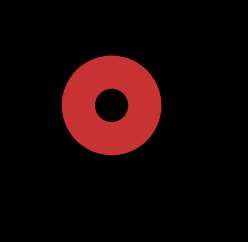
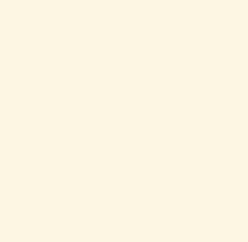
part: (111, 105) -> none

